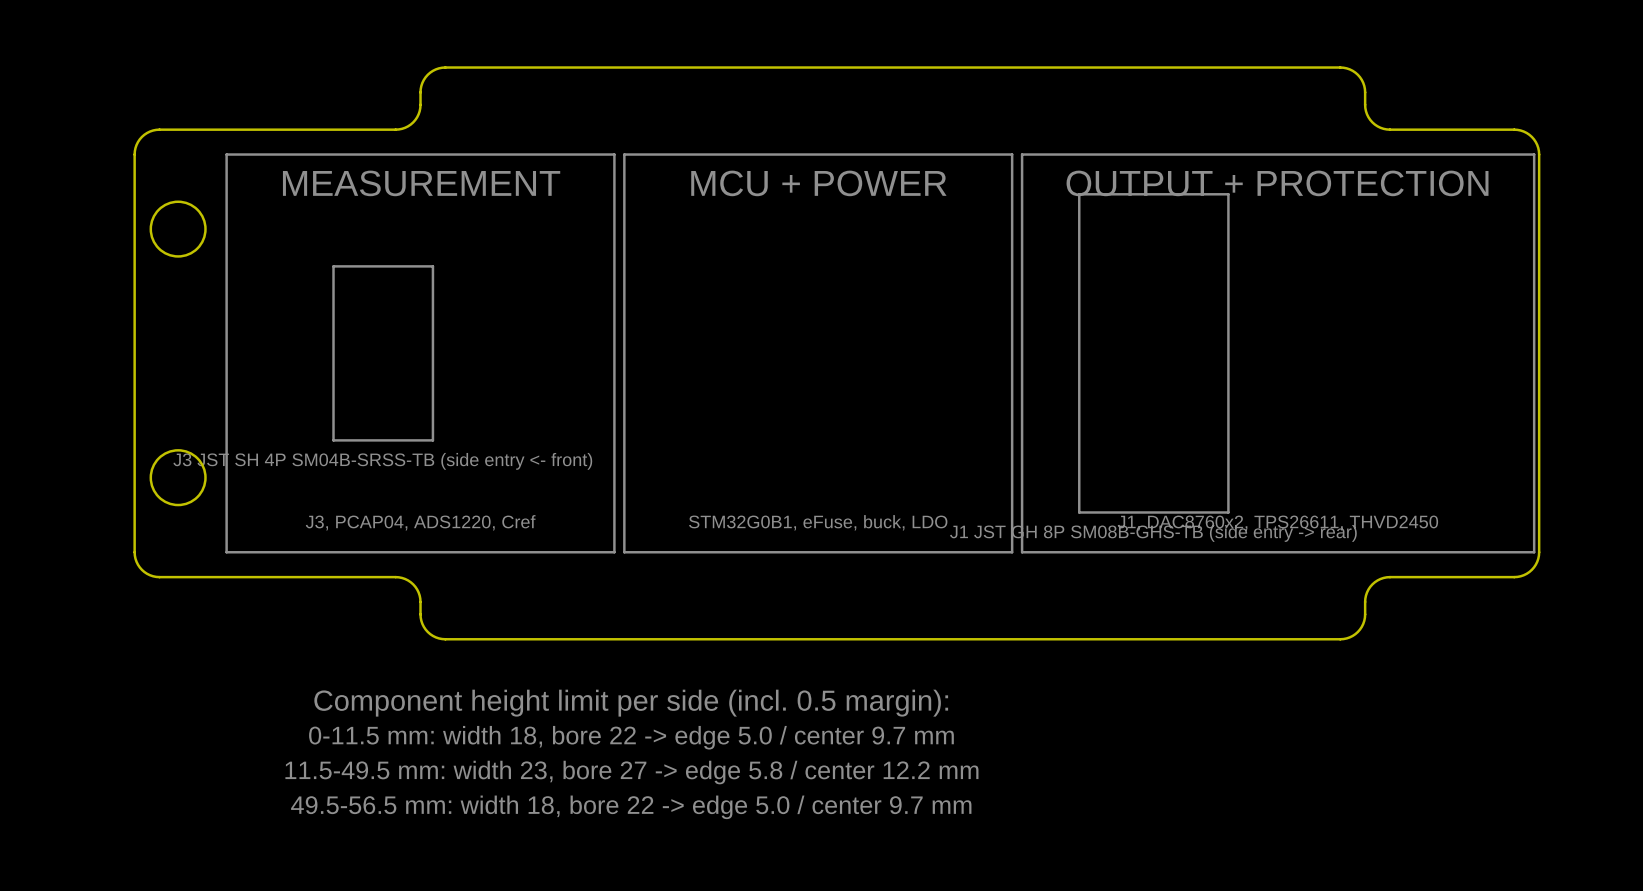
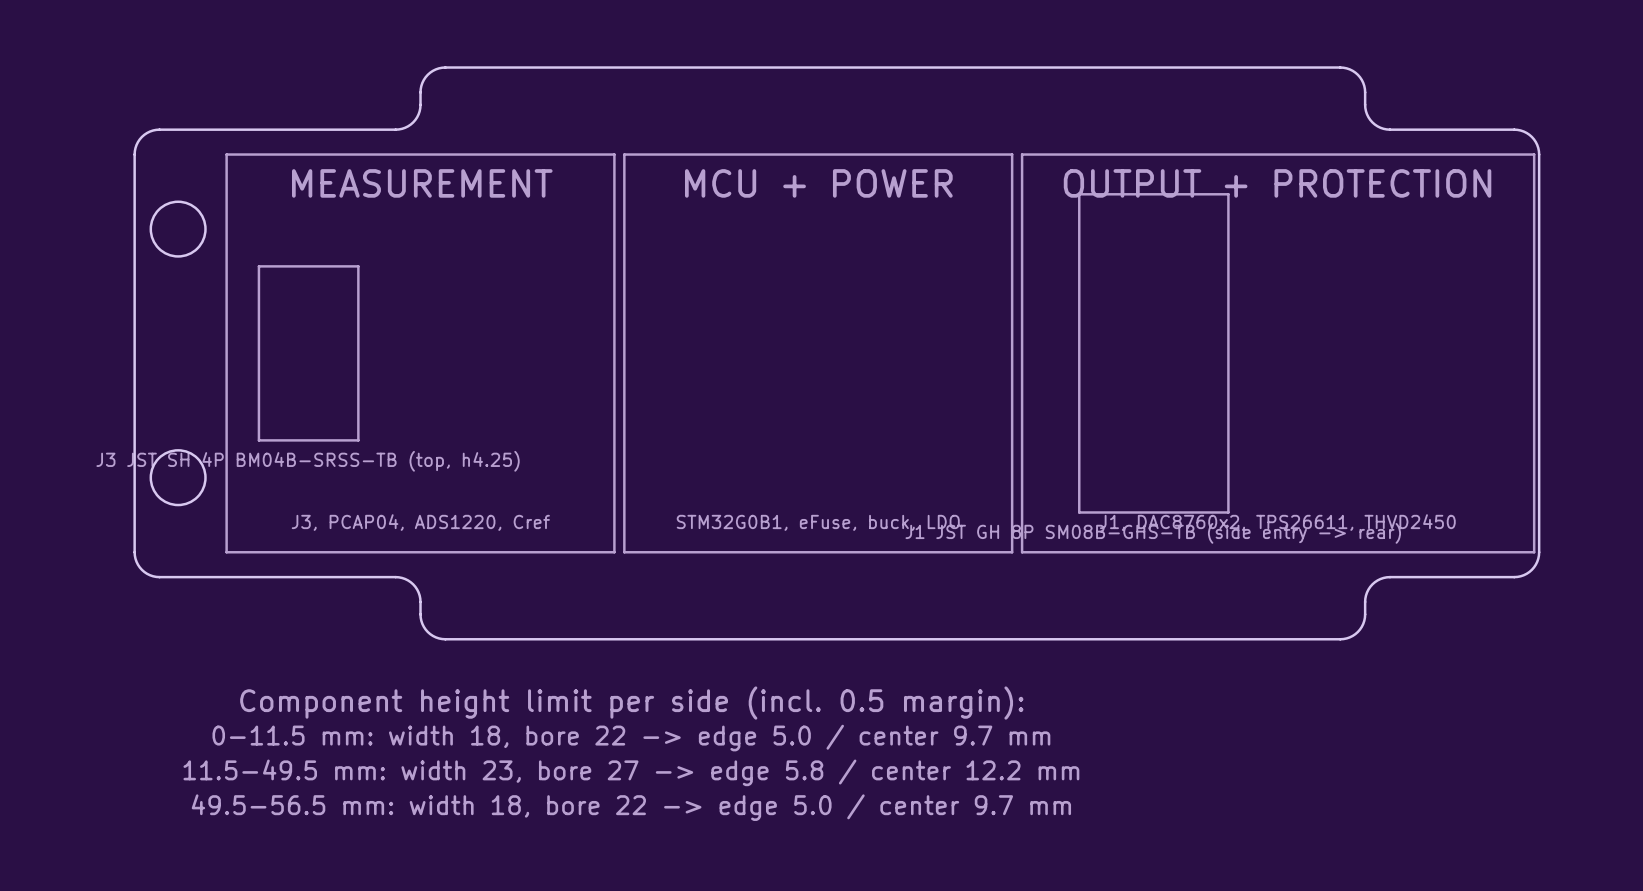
line: (333, 266) (333, 440) -> (333, 266) (258, 266) (258, 440) (333, 440)
line: (358, 266) (432, 266) (432, 440) (358, 440) -> (358, 266) (358, 440)
text: J3 JST SH 4P SM04B-SRSS-TB (side entry <- front) (382, 461) -> J3 JST SH 4P BM04B-SRSS-TB (top, h4.25) (308, 461)

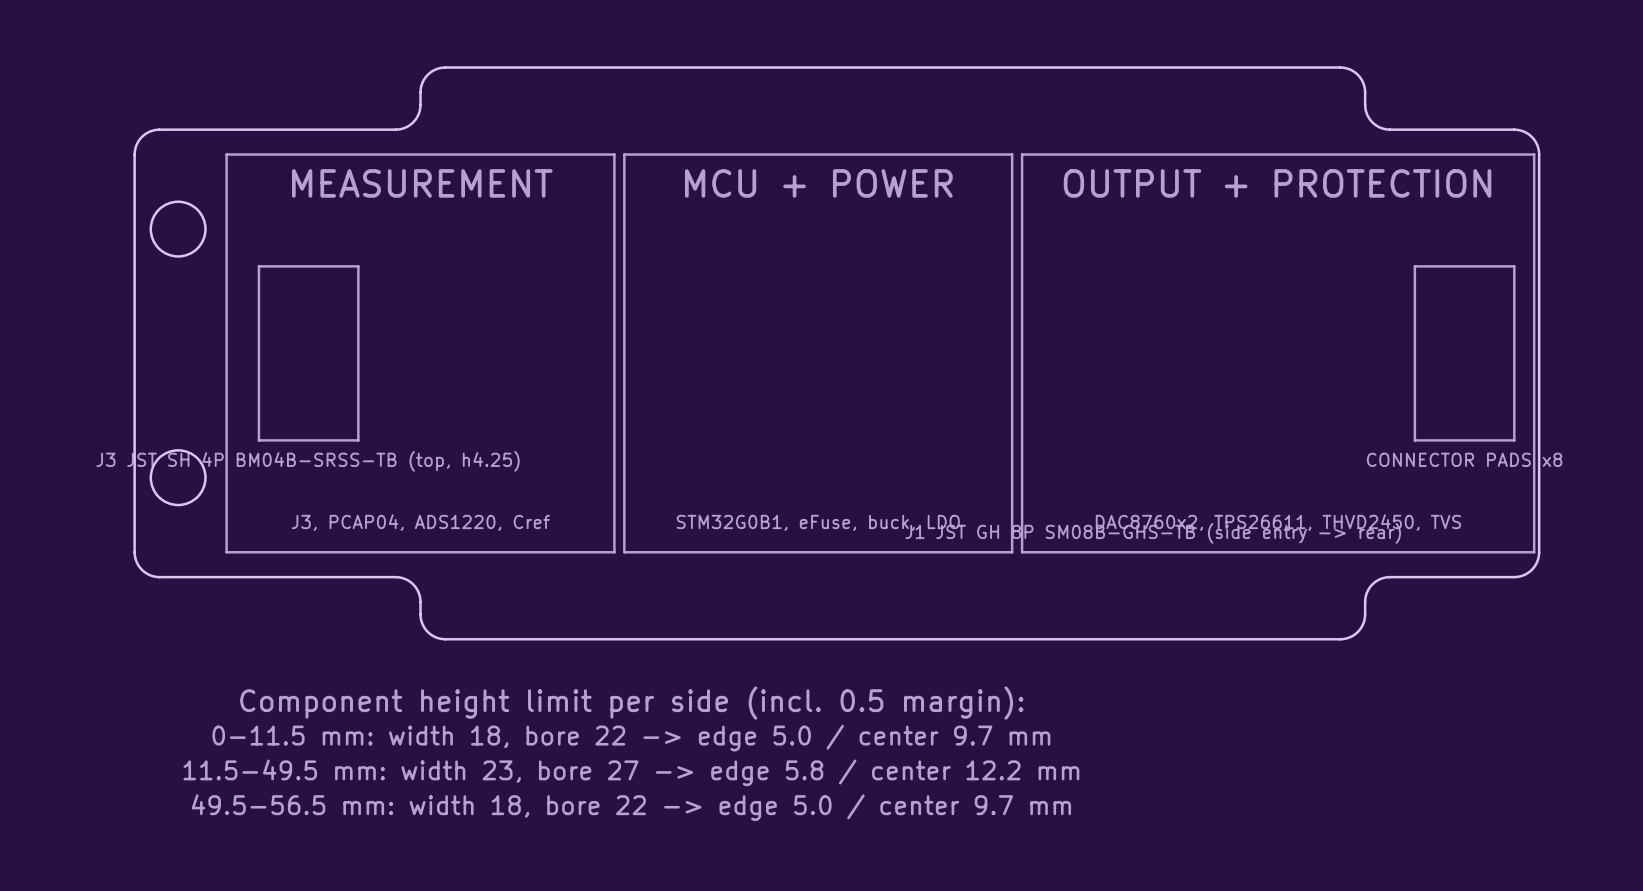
line: (1079, 194) (1228, 194) (1228, 512) (1079, 512) (1079, 194) -> none
line: none -> (1414, 266) (1514, 266) (1514, 440) (1414, 440) (1414, 266)
text: none -> CONNECTOR PADS x8 (1464, 459)
text: J1, DAC8760x2, TPS26611, THVD2450 (1277, 522) -> DAC8760x2, TPS26611, THVD2450, TVS (1278, 522)

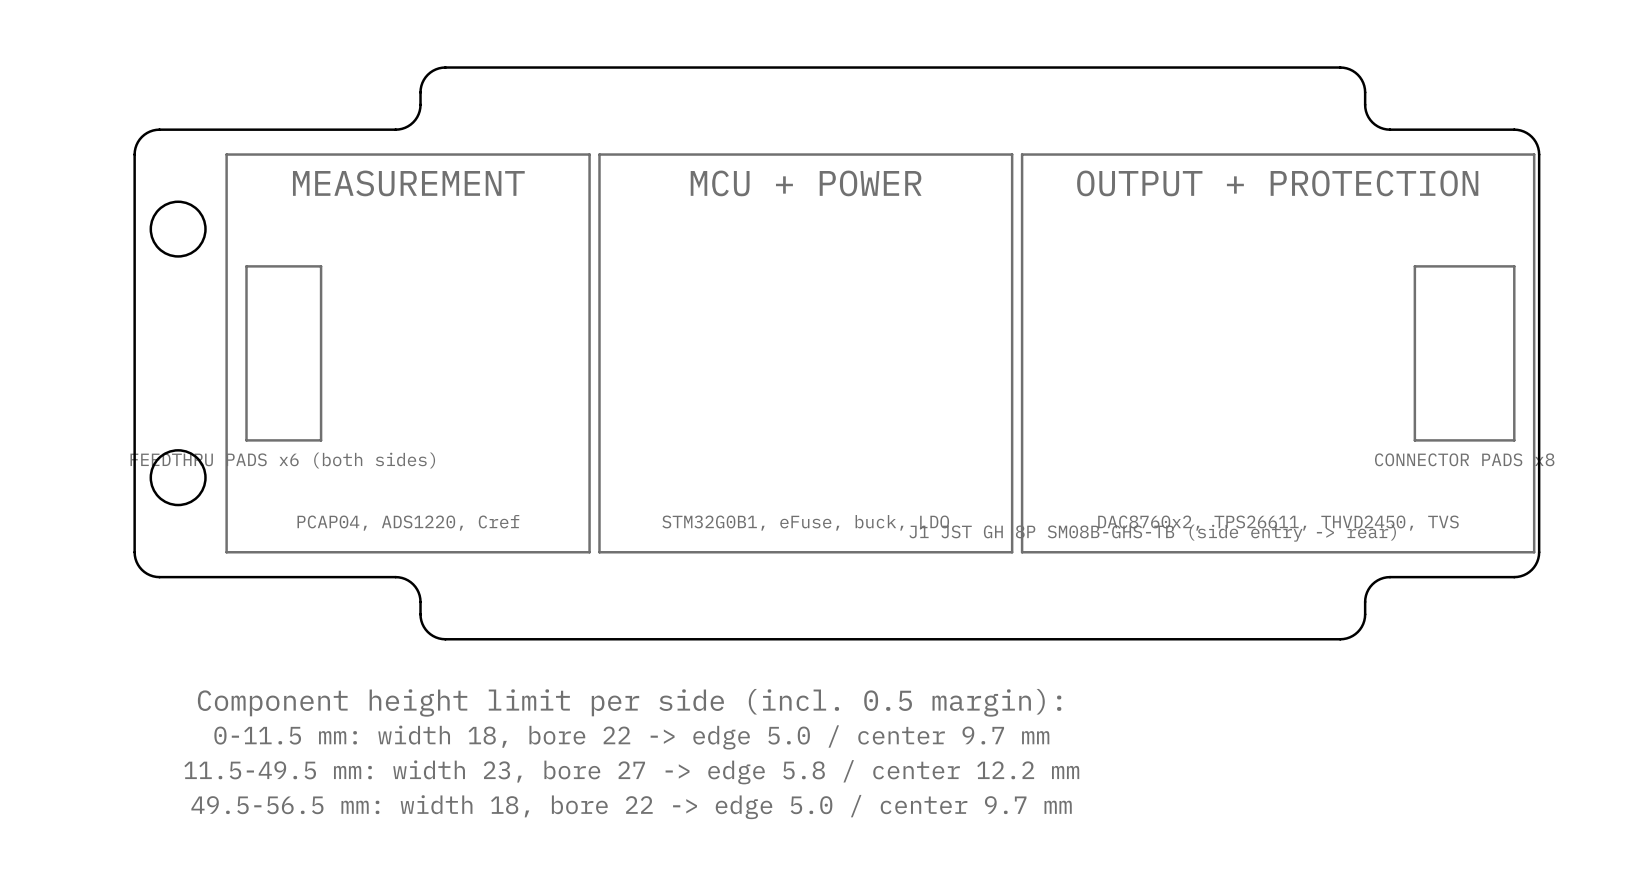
line: (589, 154) (599, 154) -> (589, 154) (589, 552)
line: (614, 154) (614, 552) -> (614, 154) (624, 154)
line: (624, 154) (624, 552) -> (614, 552) (624, 552)
text position: MEASUREMENT (422, 183) -> MEASUREMENT (408, 183)
text position: MCU + POWER (818, 183) -> MCU + POWER (806, 183)
line: (258, 266) (258, 440) -> (258, 266) (246, 266) (246, 440) (258, 440)
line: (321, 266) (358, 266) (358, 440) (321, 440) -> (321, 266) (321, 440)
text: J3 JST SH 4P BM04B-SRSS-TB (top, h4.25) (308, 461) -> FEEDTHRU PADS x6 (both sides) (282, 460)
text: J3, PCAP04, ADS1220, Cref (420, 522) -> PCAP04, ADS1220, Cref (408, 522)
text position: STM32G0B1, eFuse, buck, LDO (818, 522) -> STM32G0B1, eFuse, buck, LDO (805, 522)
line: (589, 552) (599, 552) -> (599, 154) (599, 552)

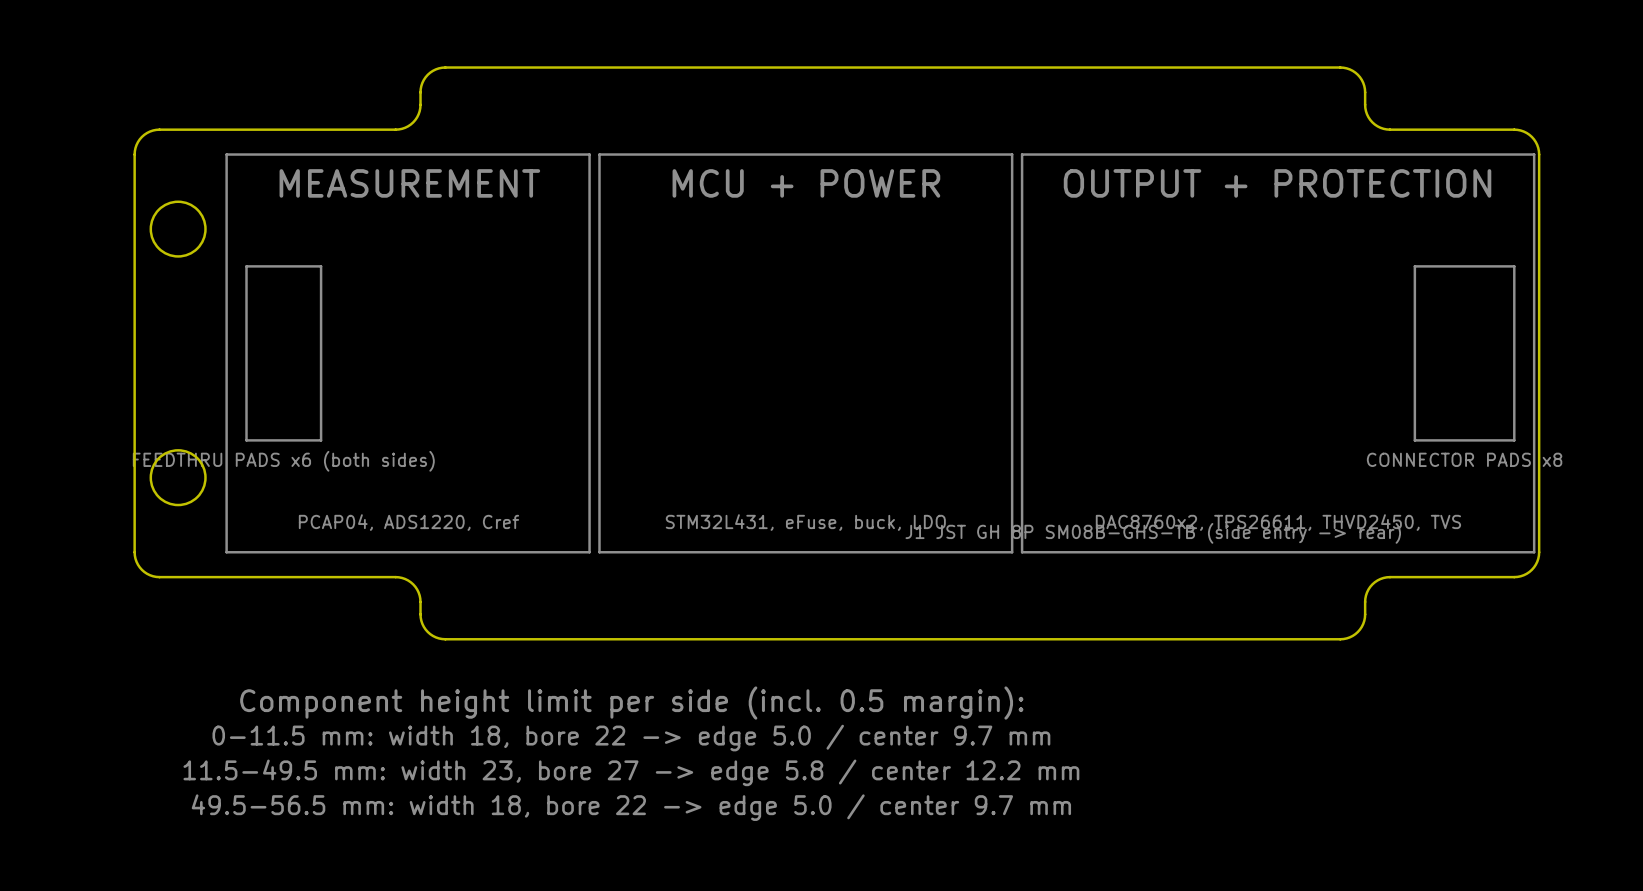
text: STM32G0B1, eFuse, buck, LDO (805, 522) -> STM32L431, eFuse, buck, LDO (805, 522)

